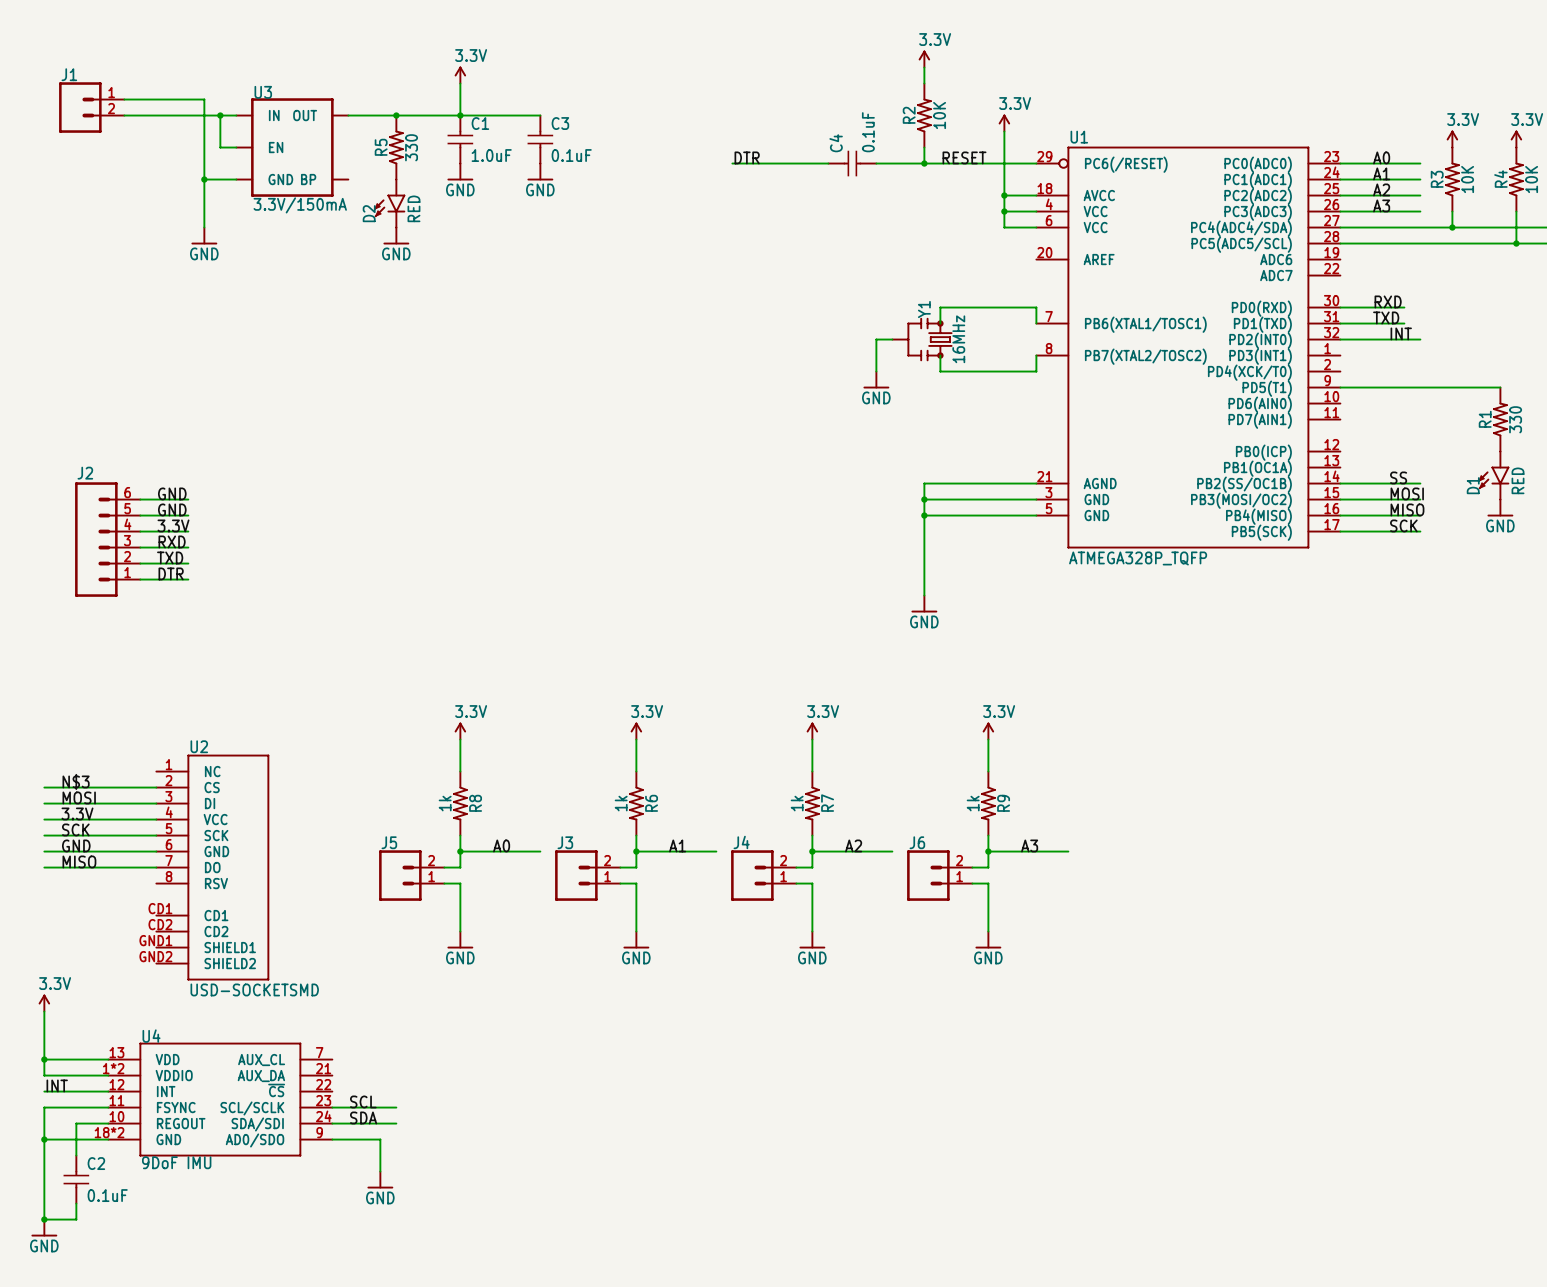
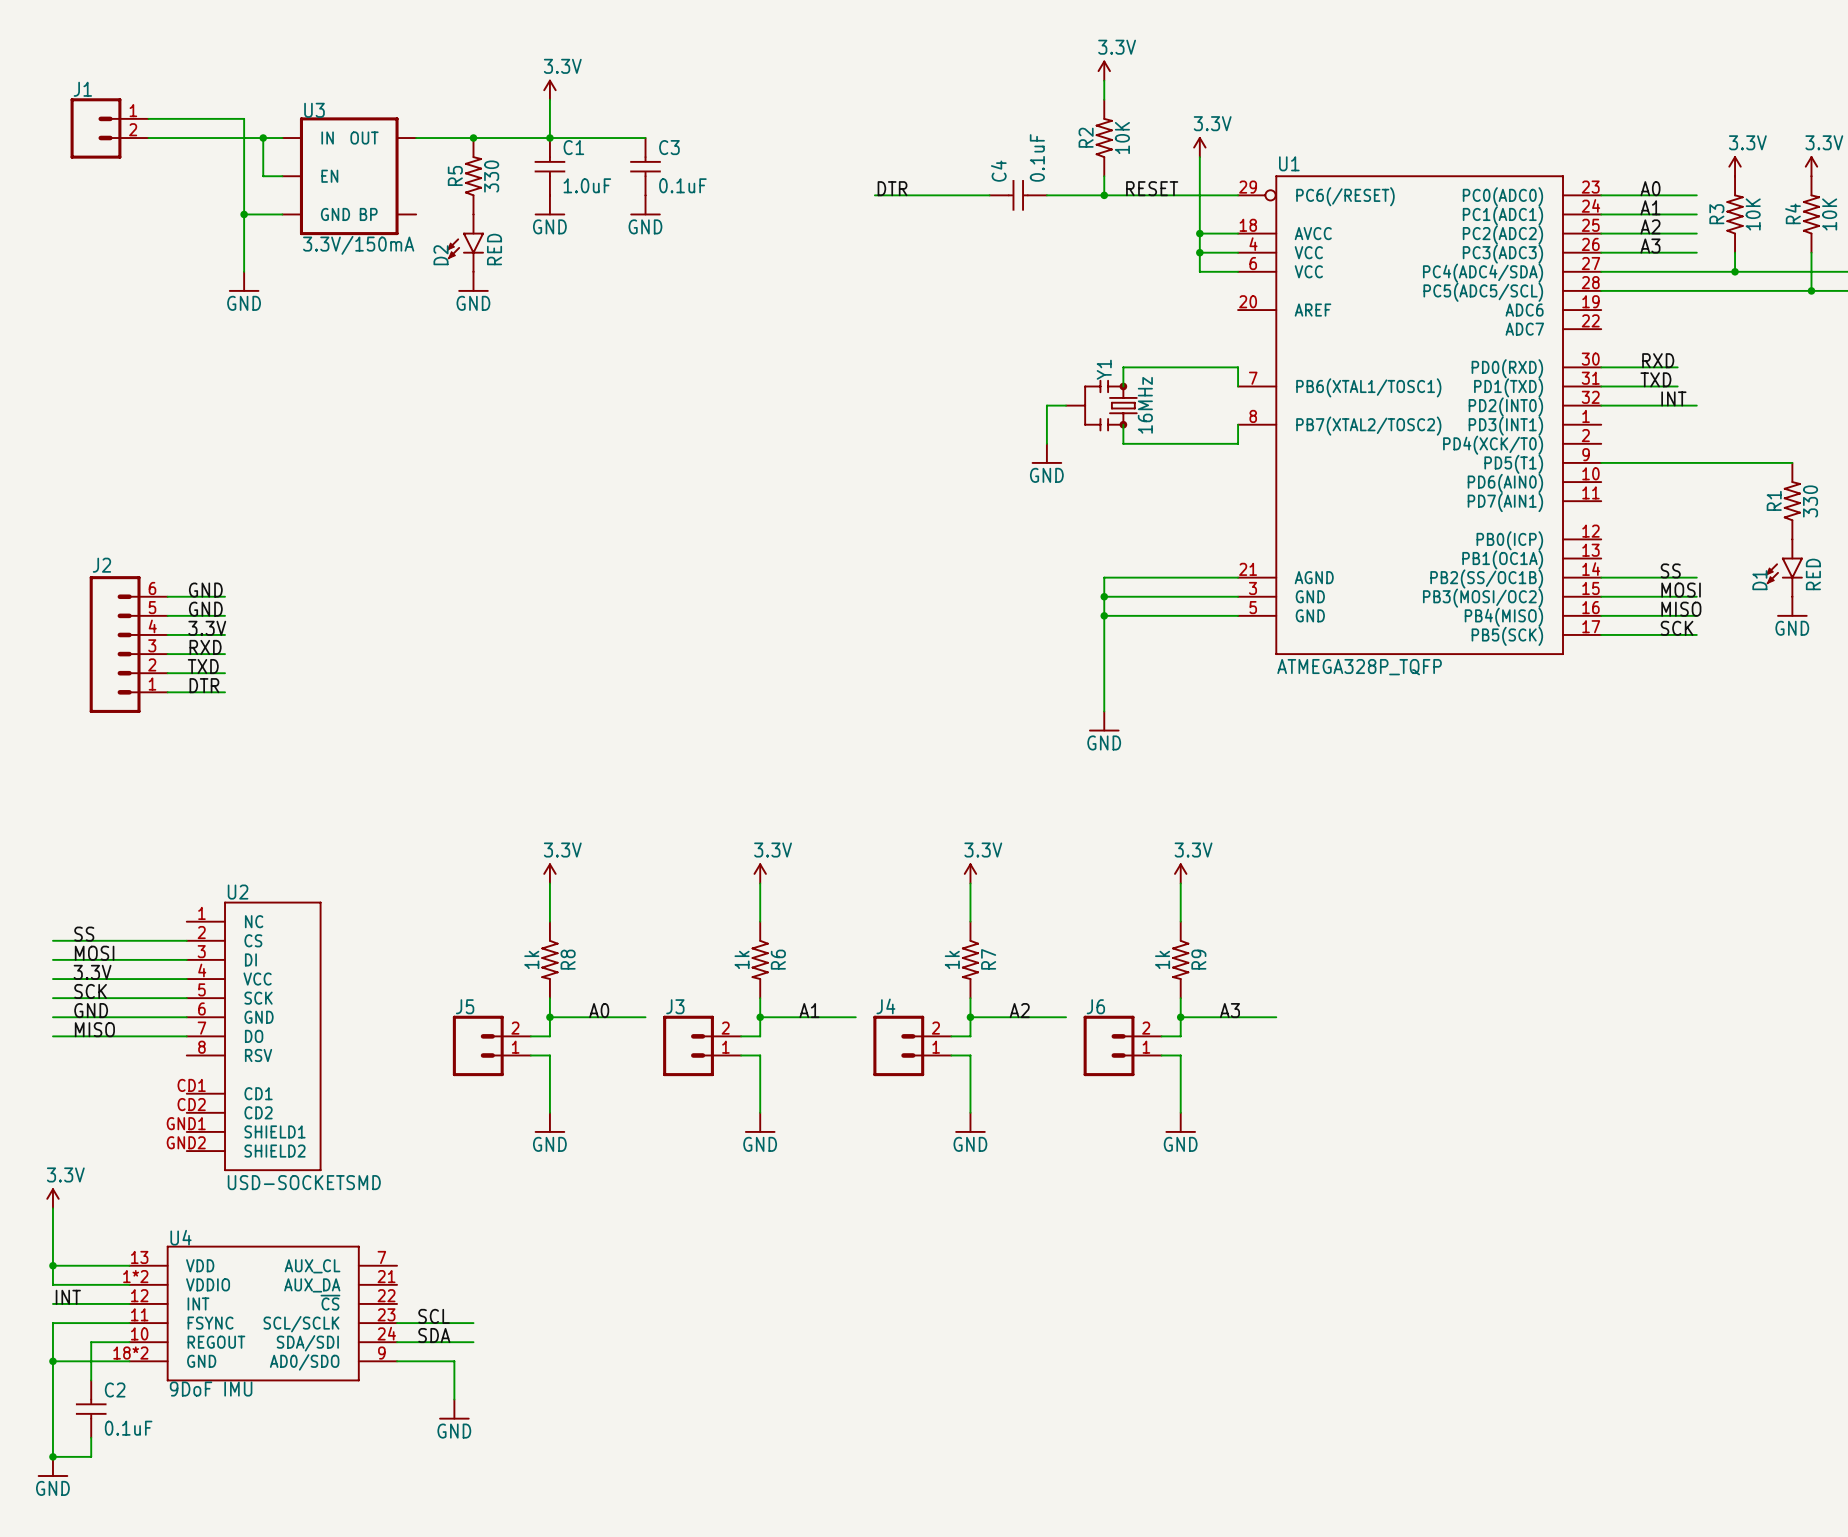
label: N$3 (76, 781) -> SS (84, 934)

